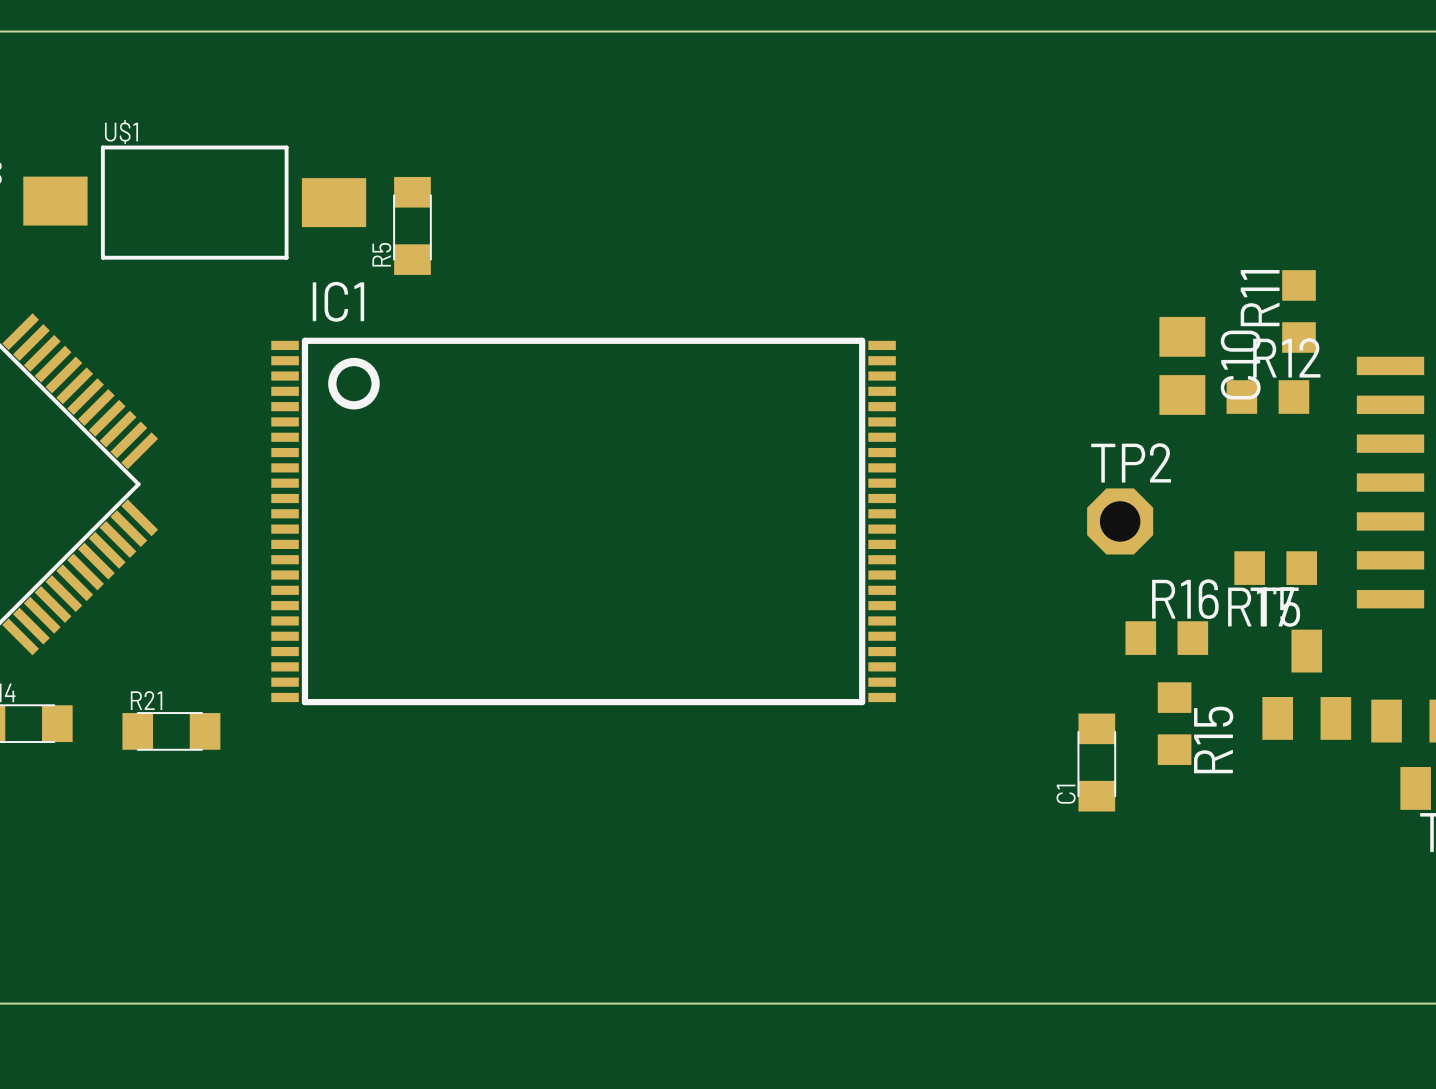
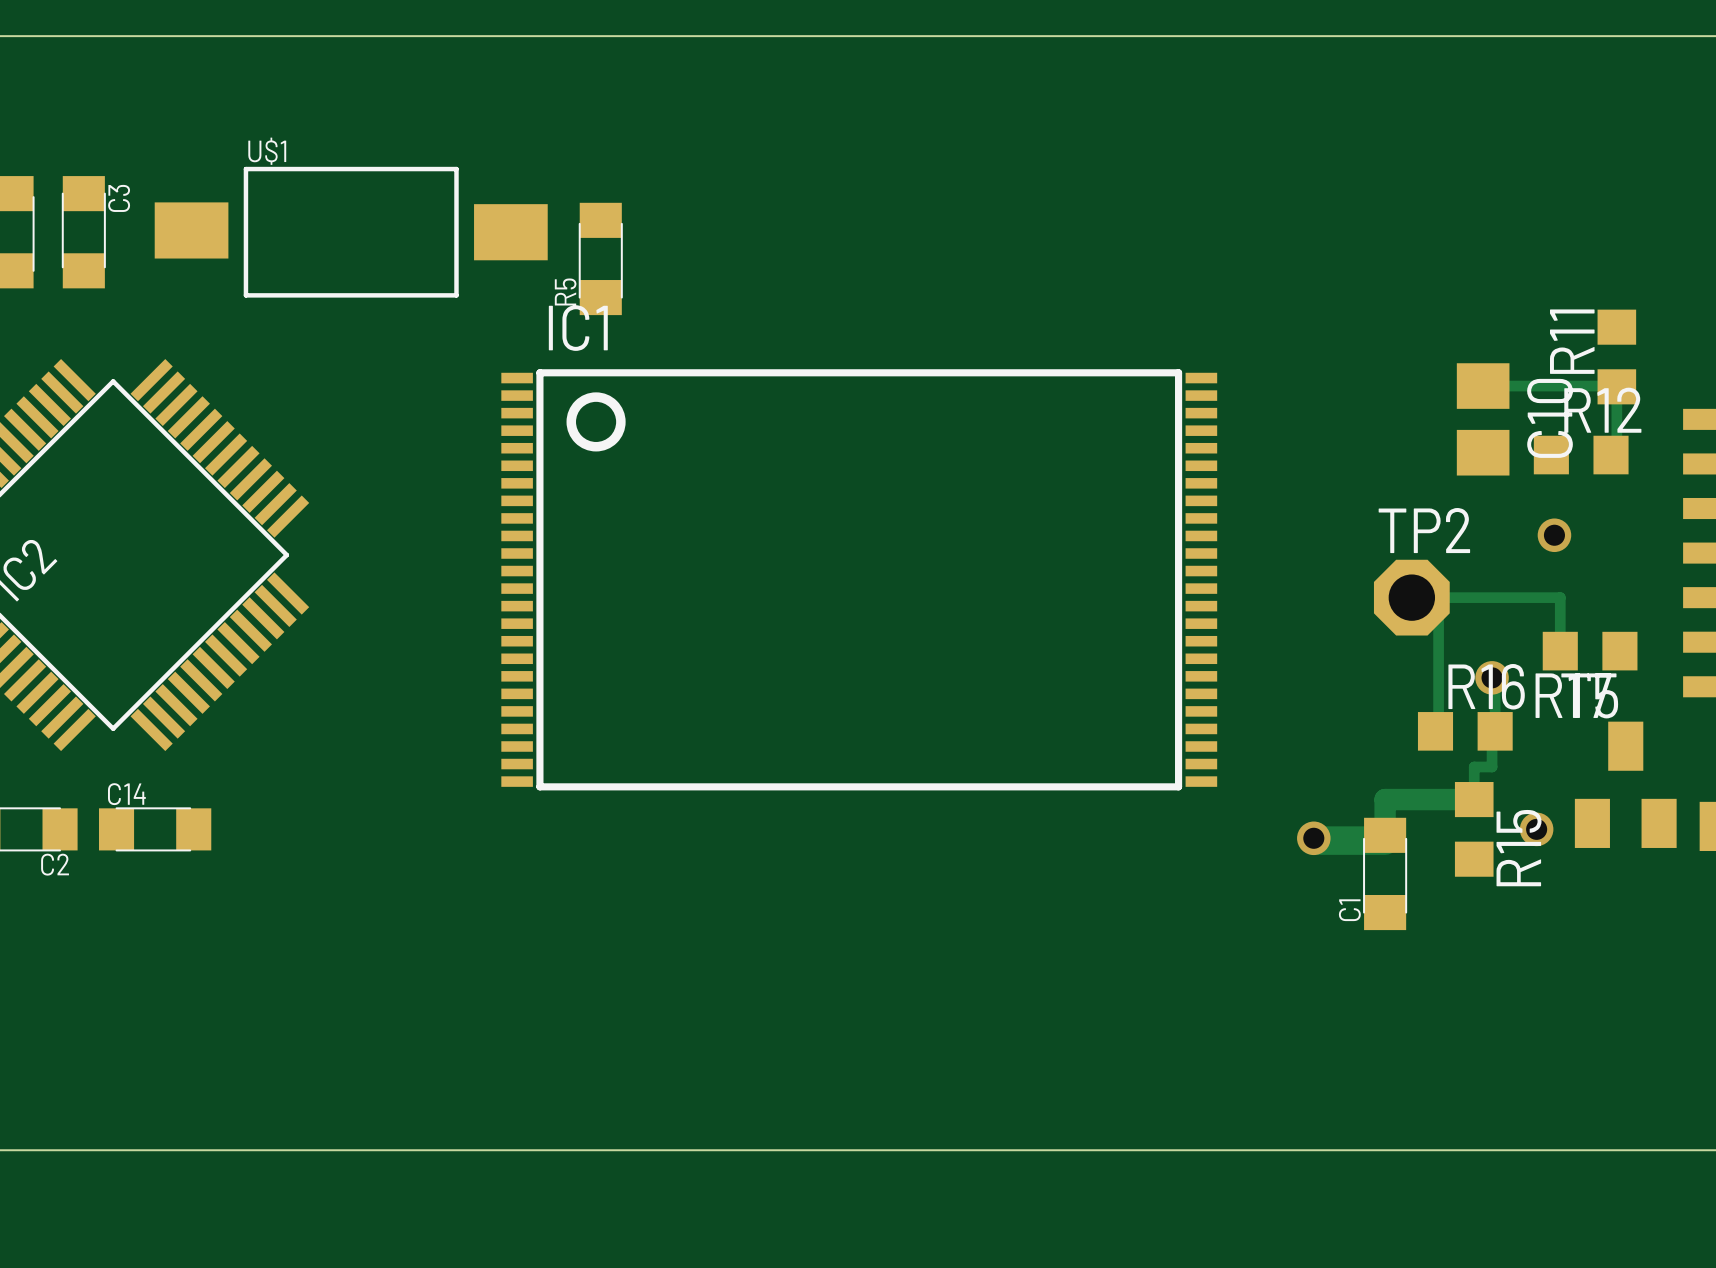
track: none -> (1483, 386) (1616, 386) (1616, 455)
via: none -> (1554, 535)
IC1 position: (583, 521) -> (859, 579)
track: none -> (1411, 597) (1560, 597) (1560, 651)
track: none -> (1438, 597) (1438, 731) (1435, 731)
track: none -> (1492, 677) (1495, 677) (1495, 731) (1492, 731) (1492, 766) (1474, 766) (1474, 799) (1385, 799) (1385, 840) (1313, 840) (1313, 838)
via: none -> (1492, 677)
via: none -> (1536, 829)
R21: (171, 731) -> none
via: none -> (1313, 838)

